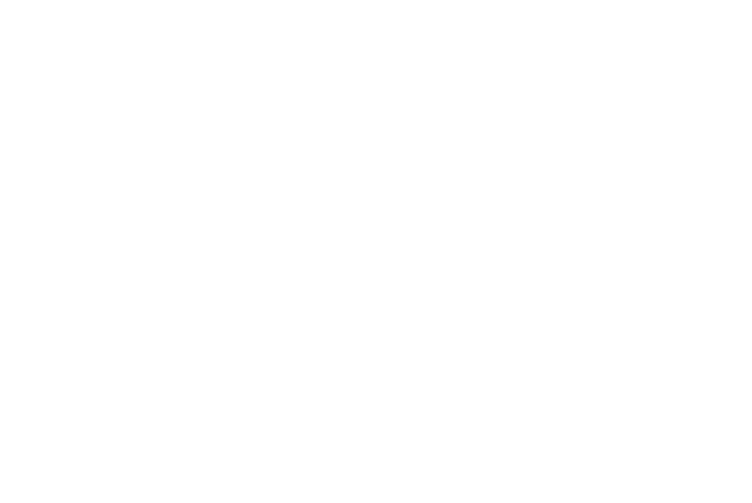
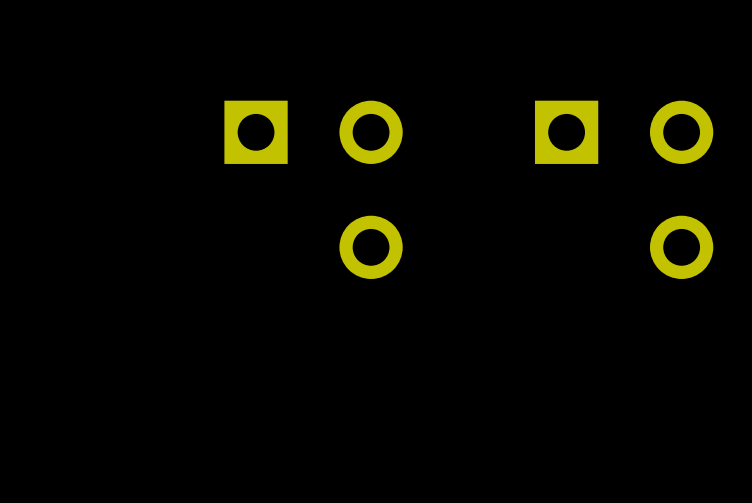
part: none -> (313, 189)
part: none -> (624, 189)

